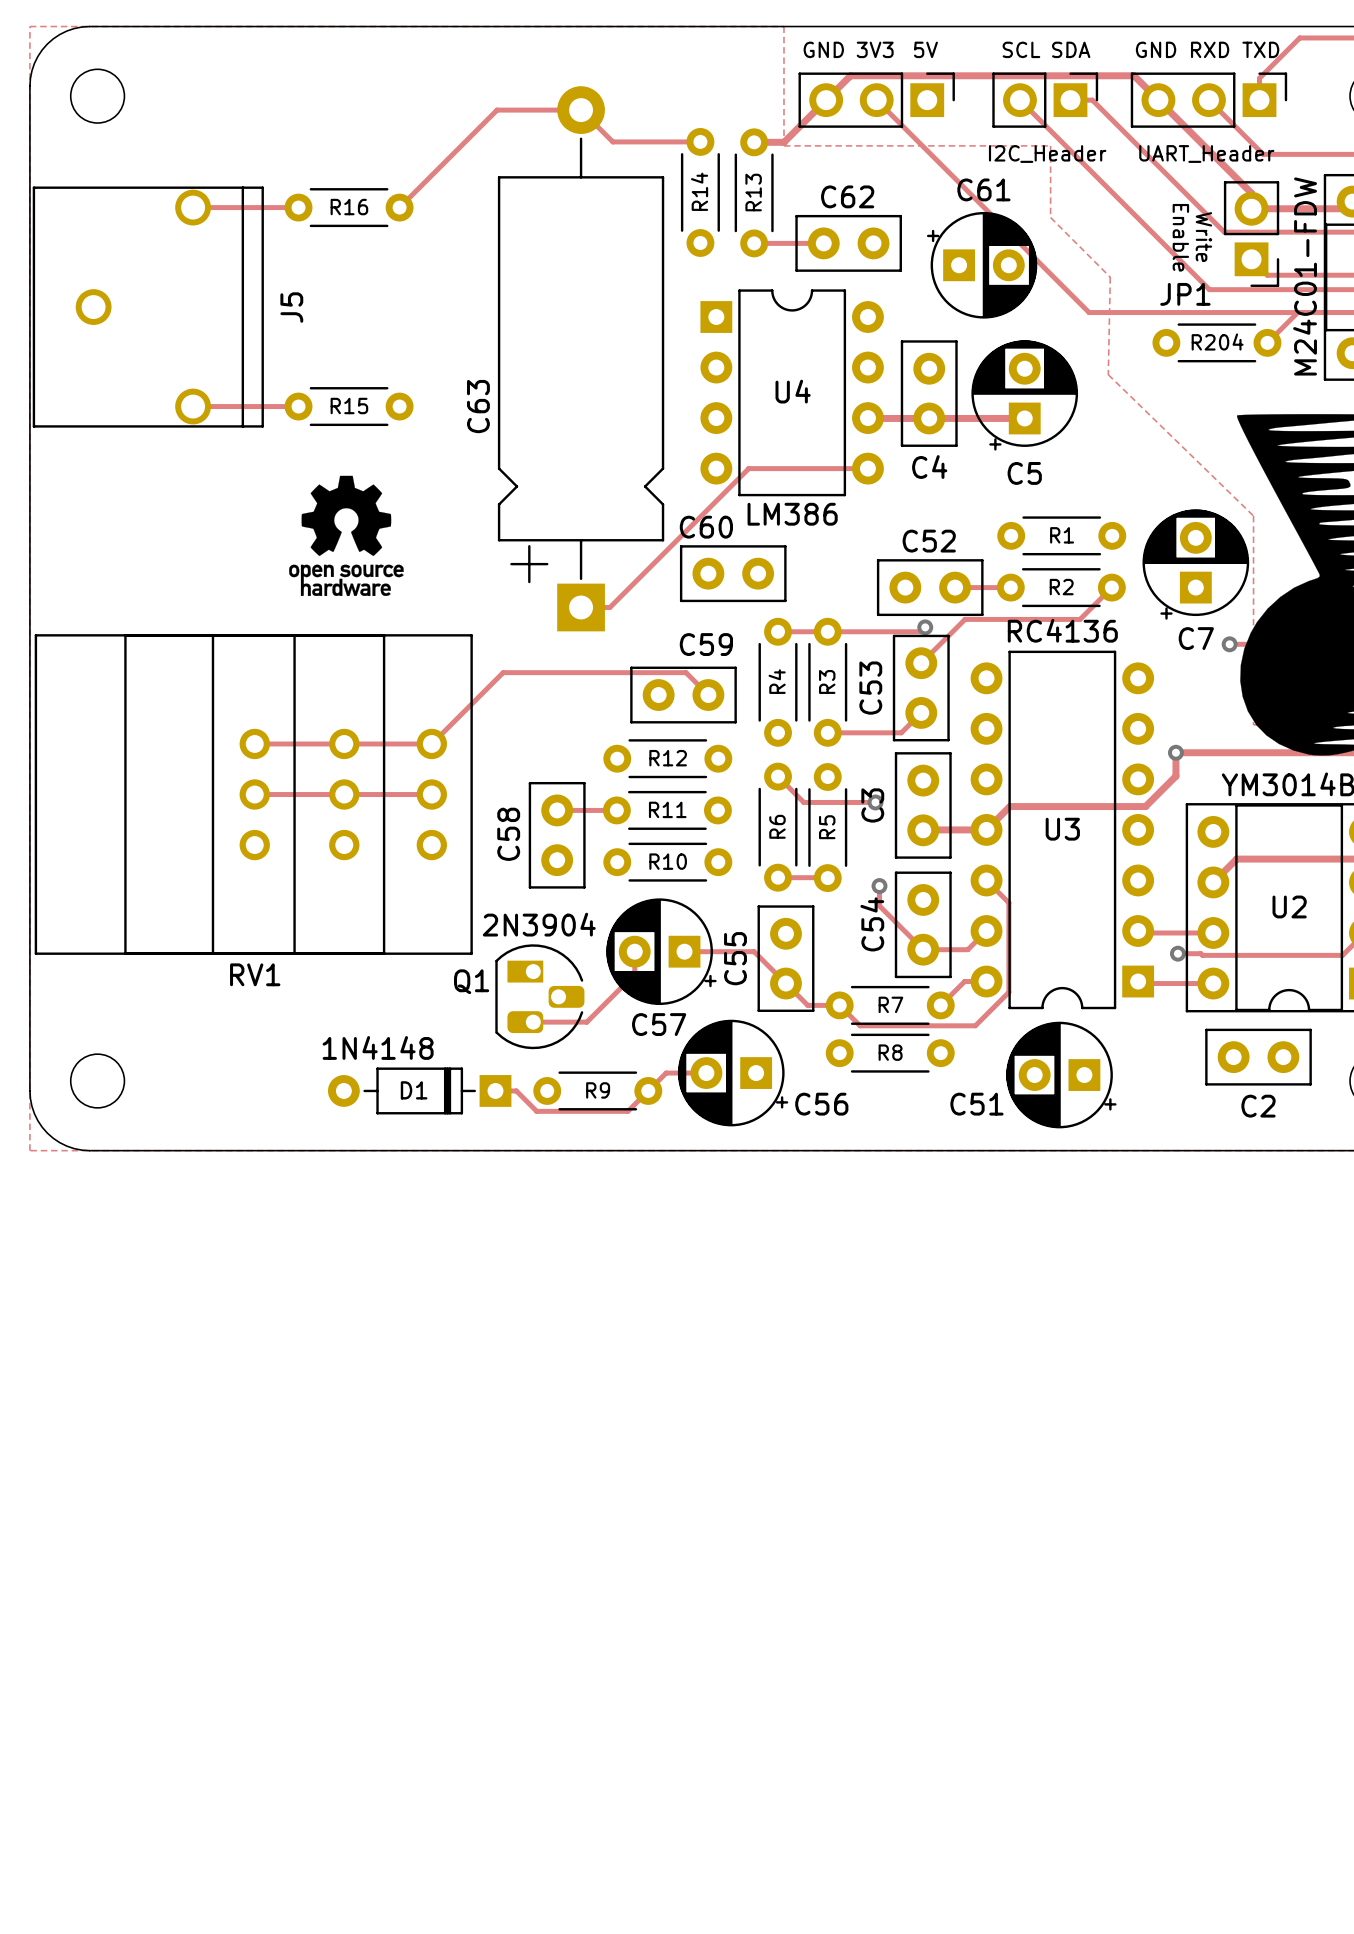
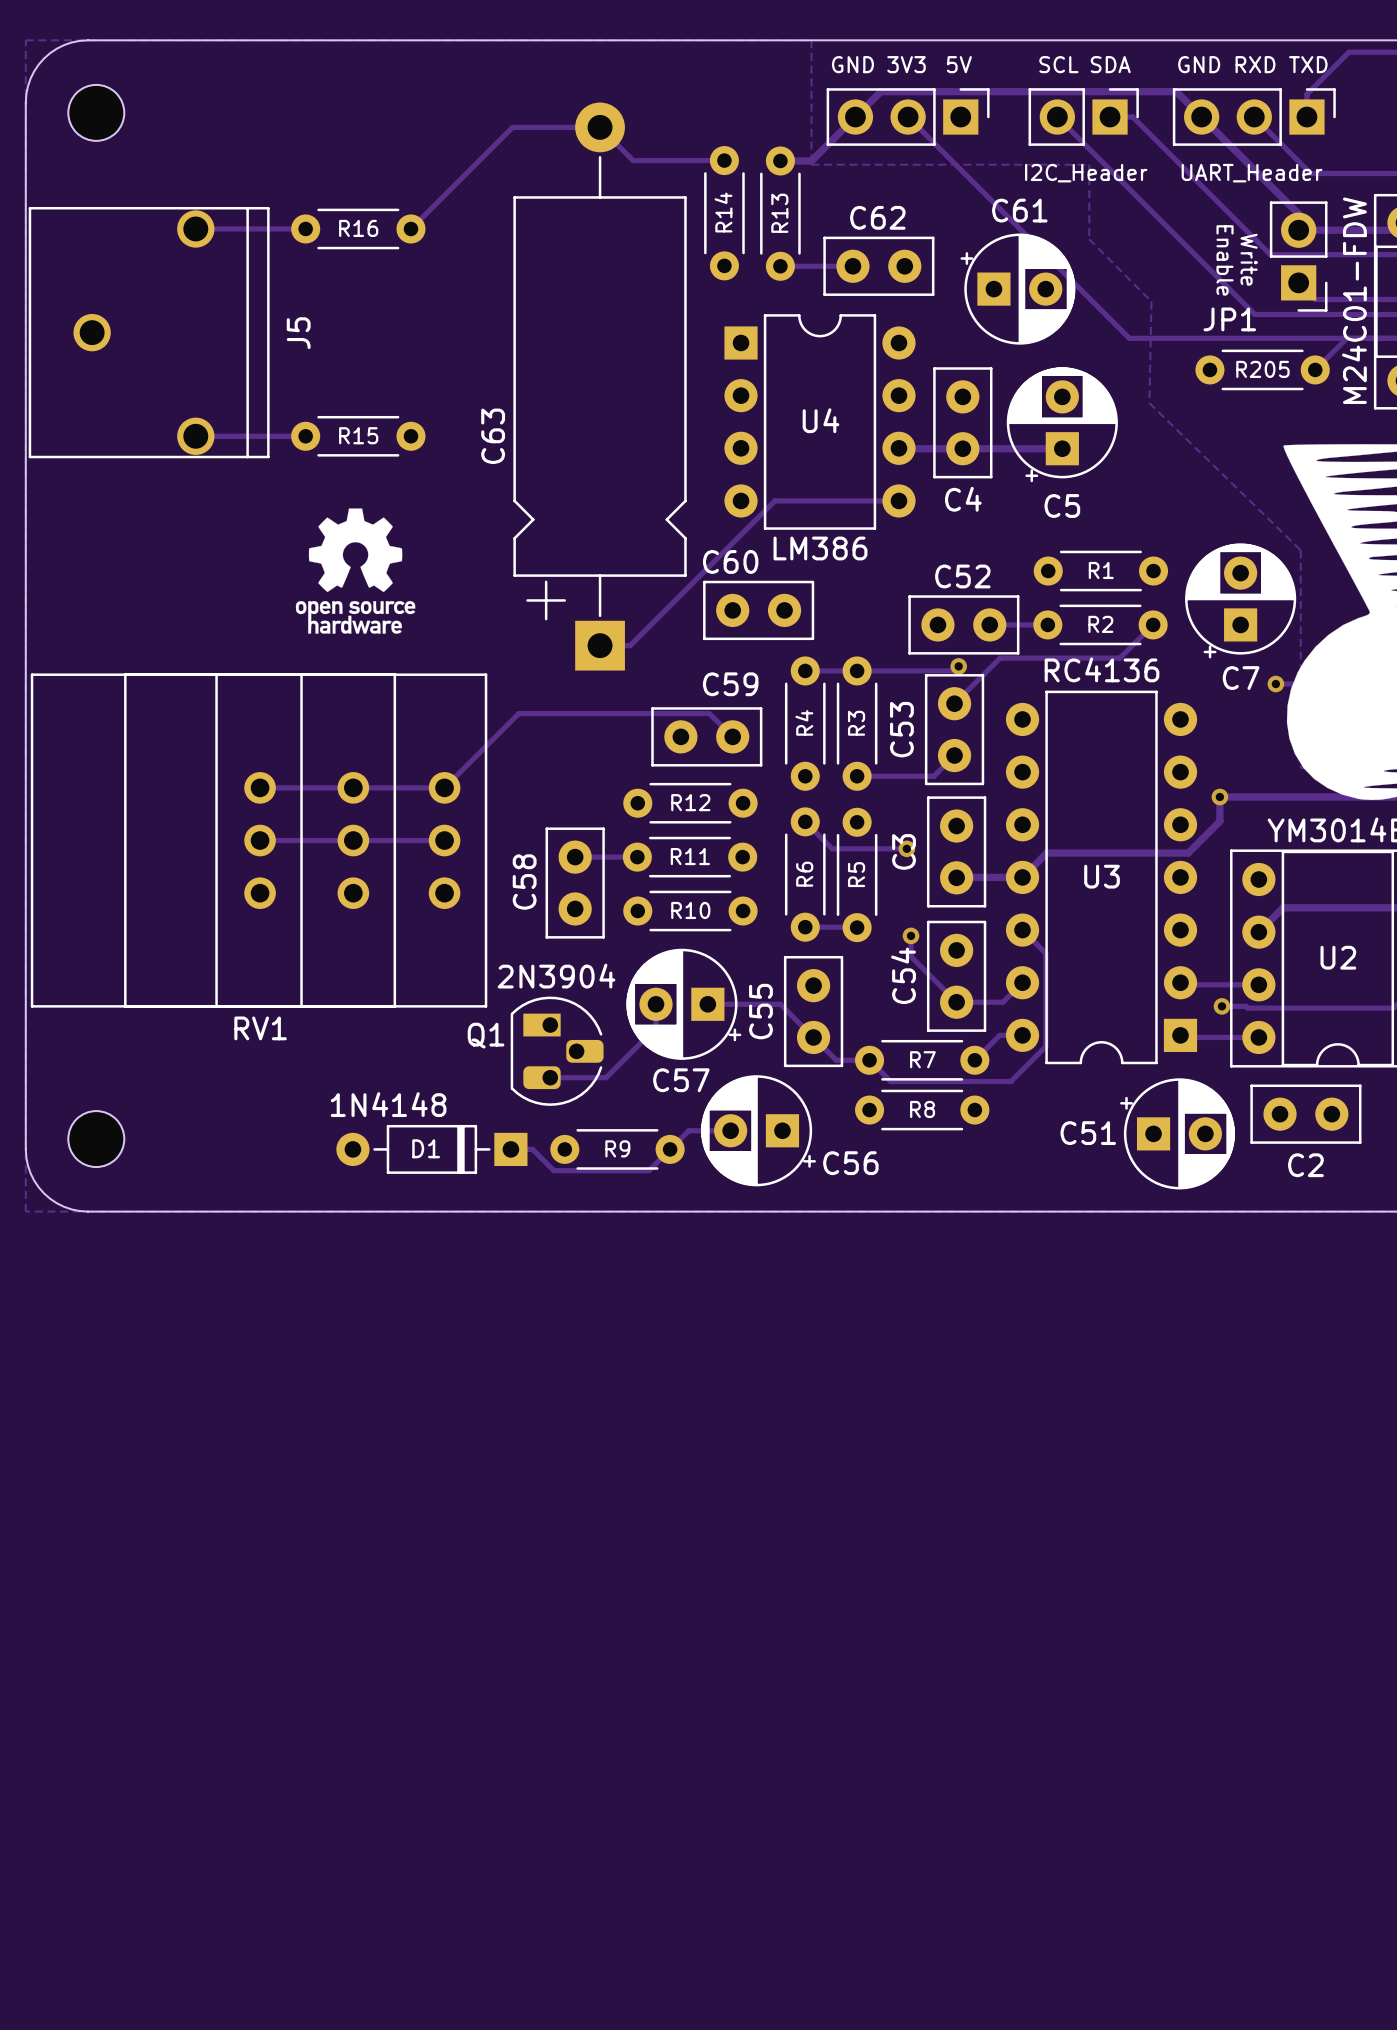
R204 name: R204 (1217, 342) -> R205 (1262, 369)
C51 rotation: 0° (1061, 1075) -> 180° (1177, 1133)
C51 position: (1061, 1075) -> (1177, 1133)

